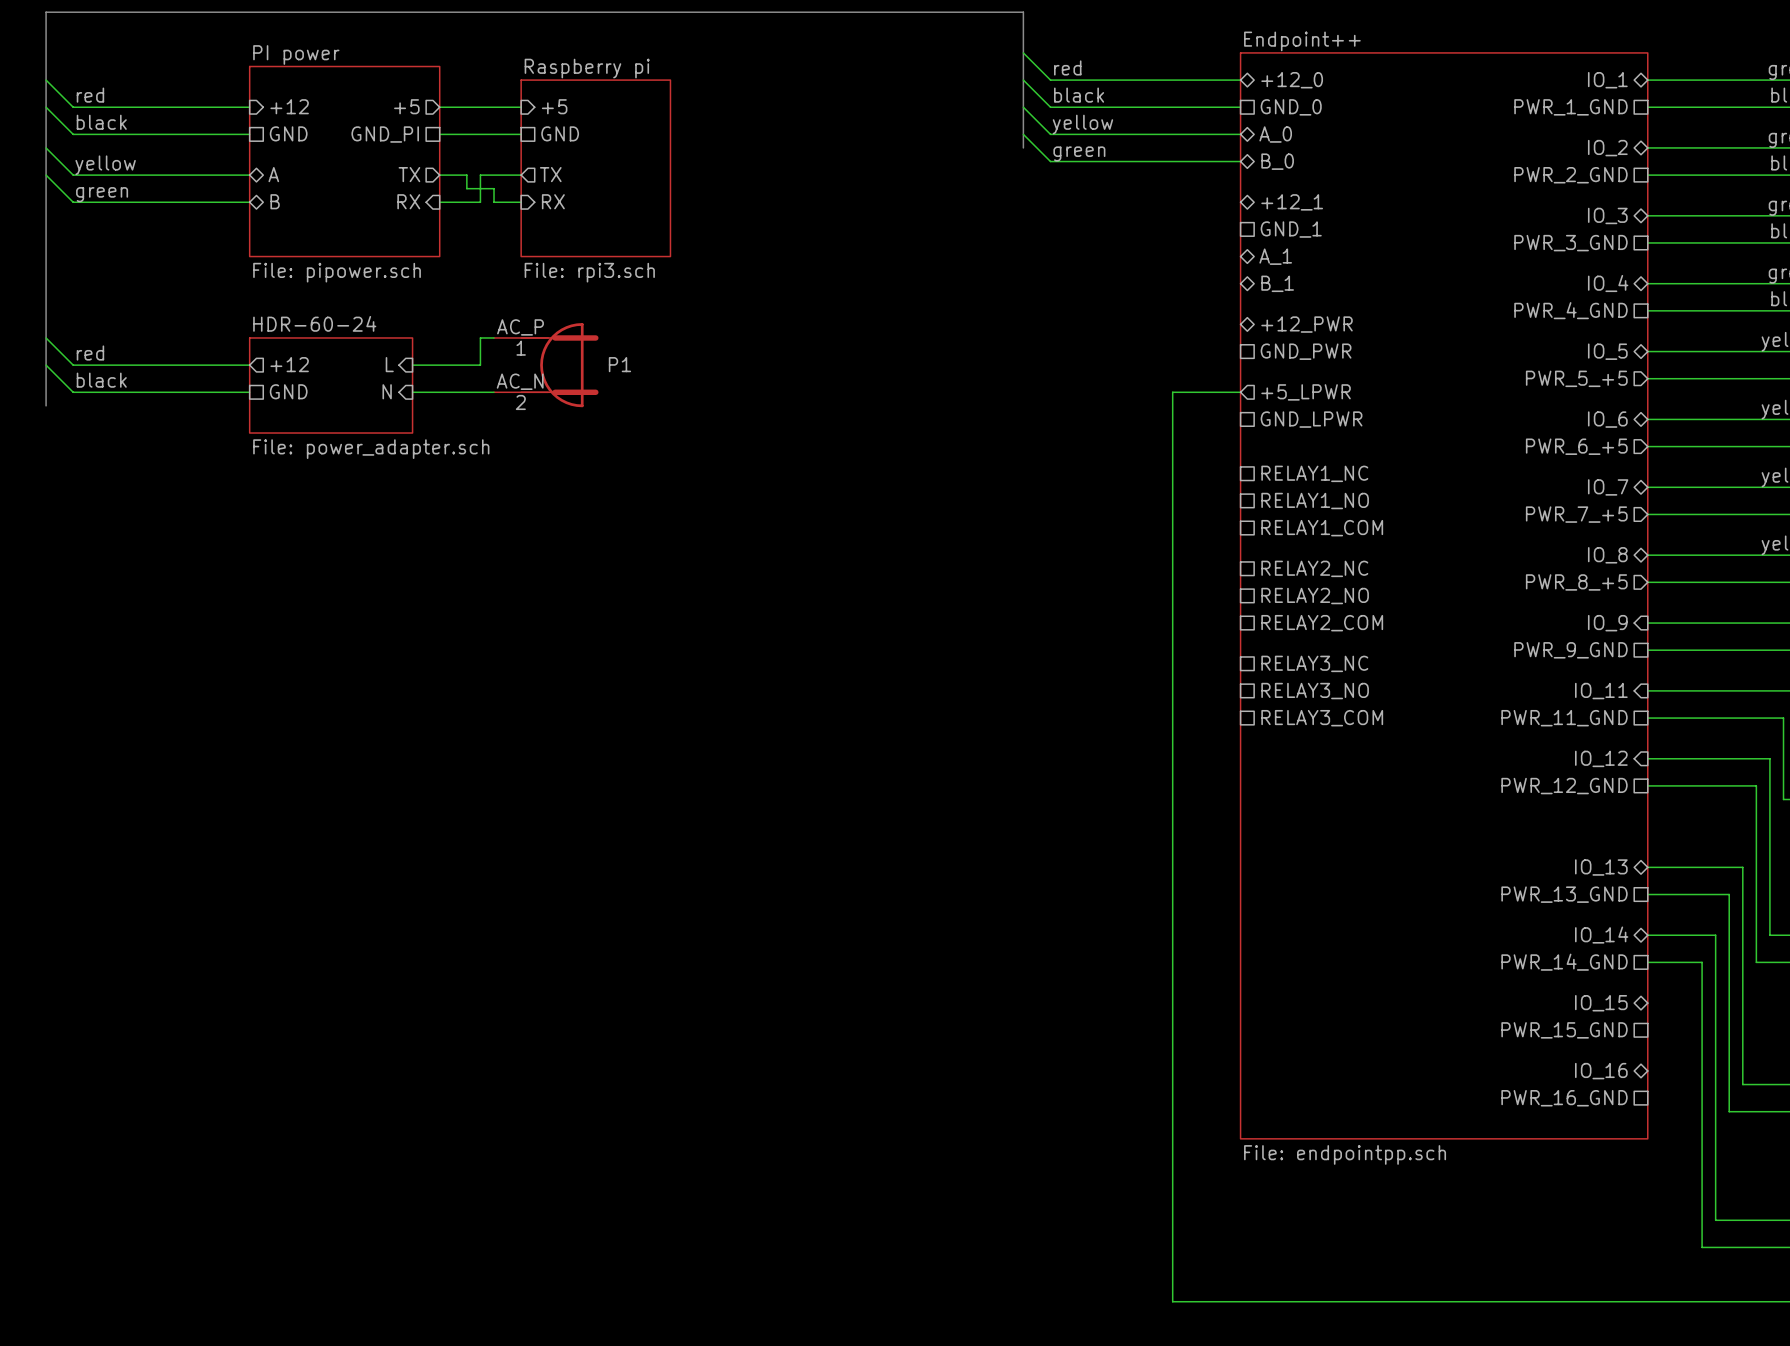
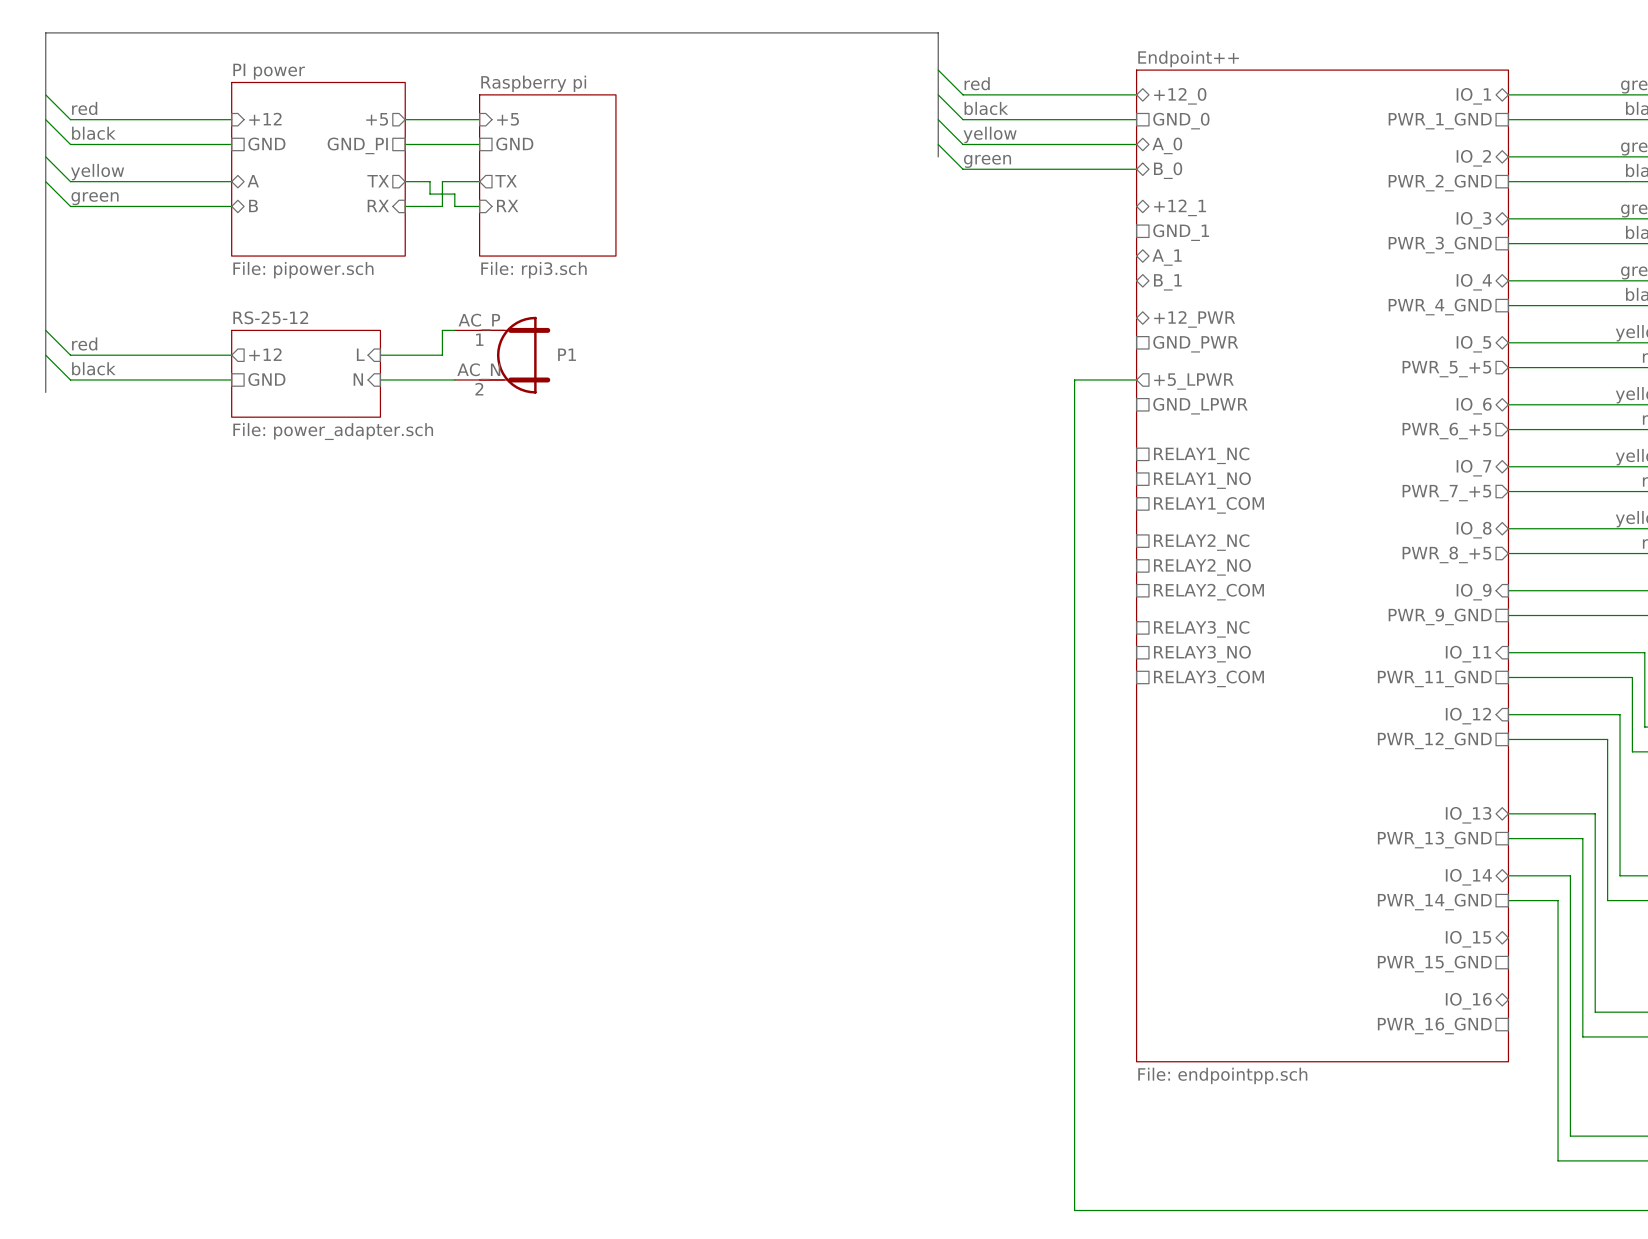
sheet HDR-60-24 name: HDR-60-24 (314, 323) -> RS-25-12 (270, 317)

